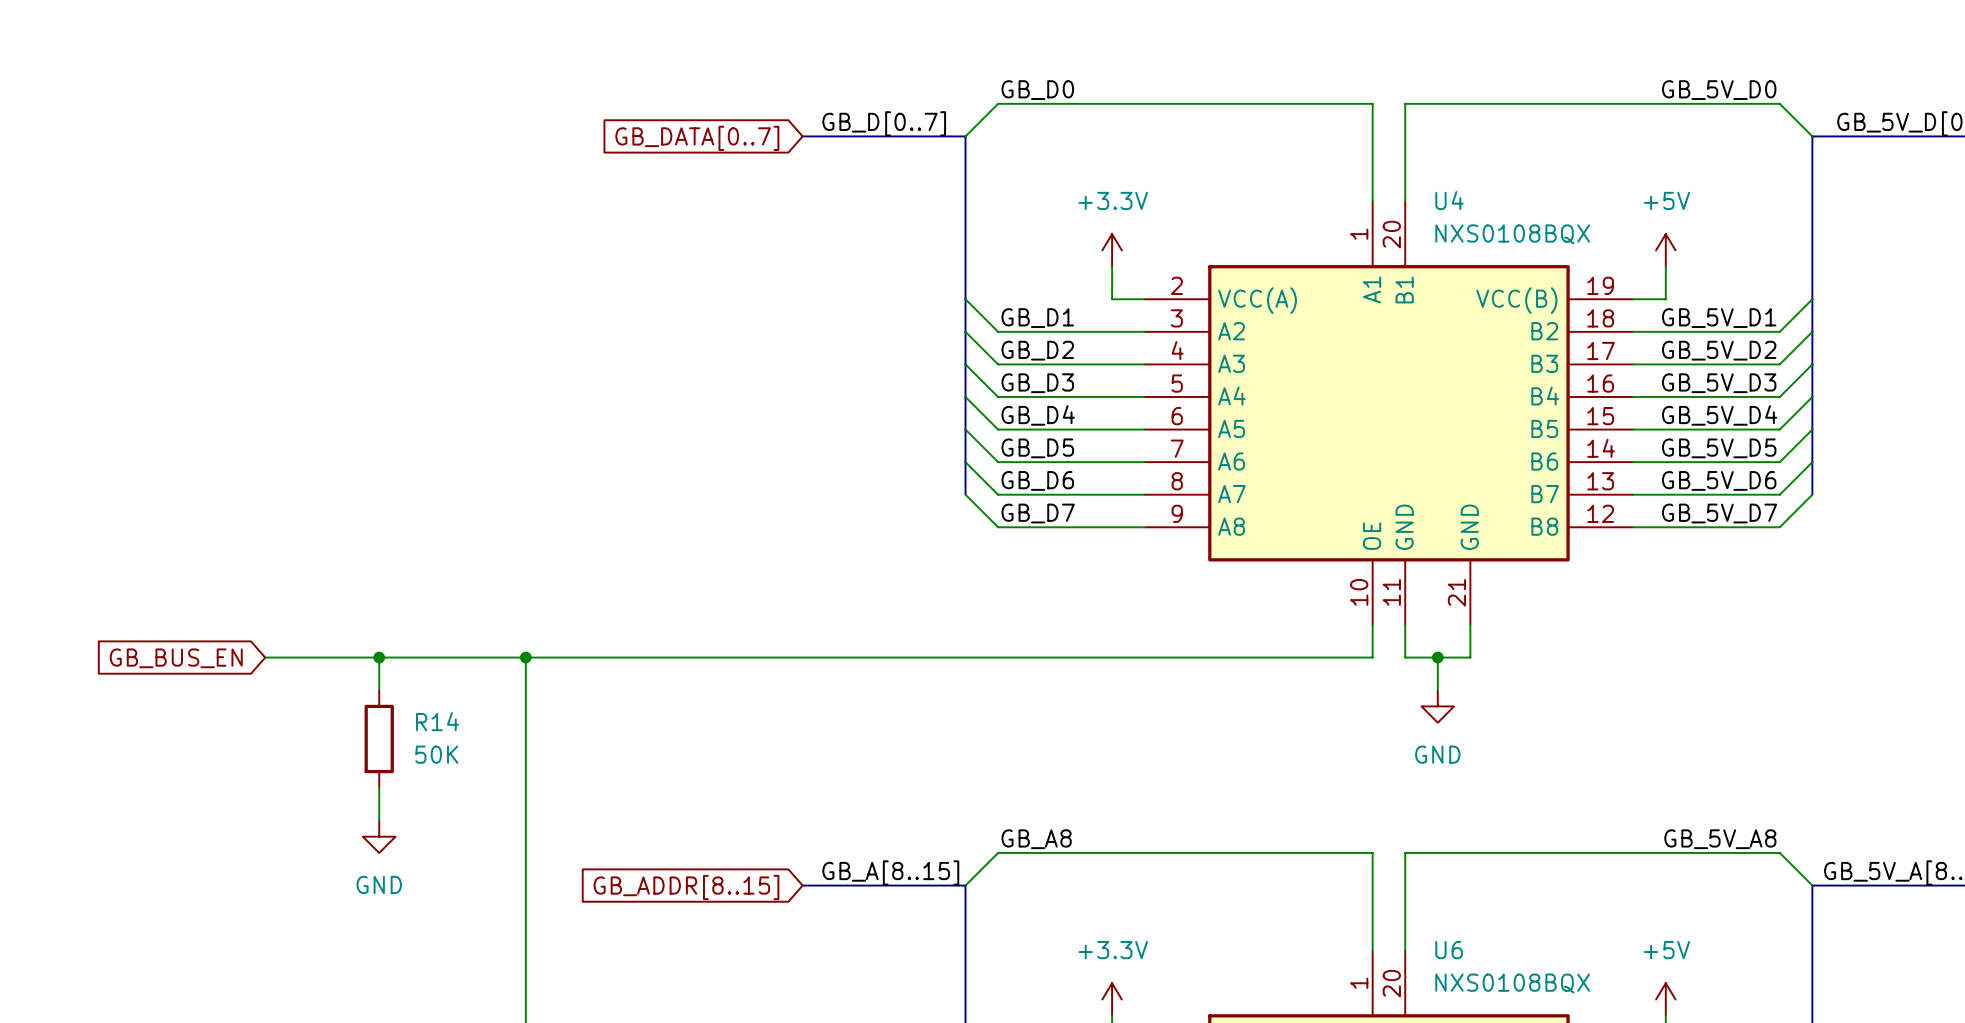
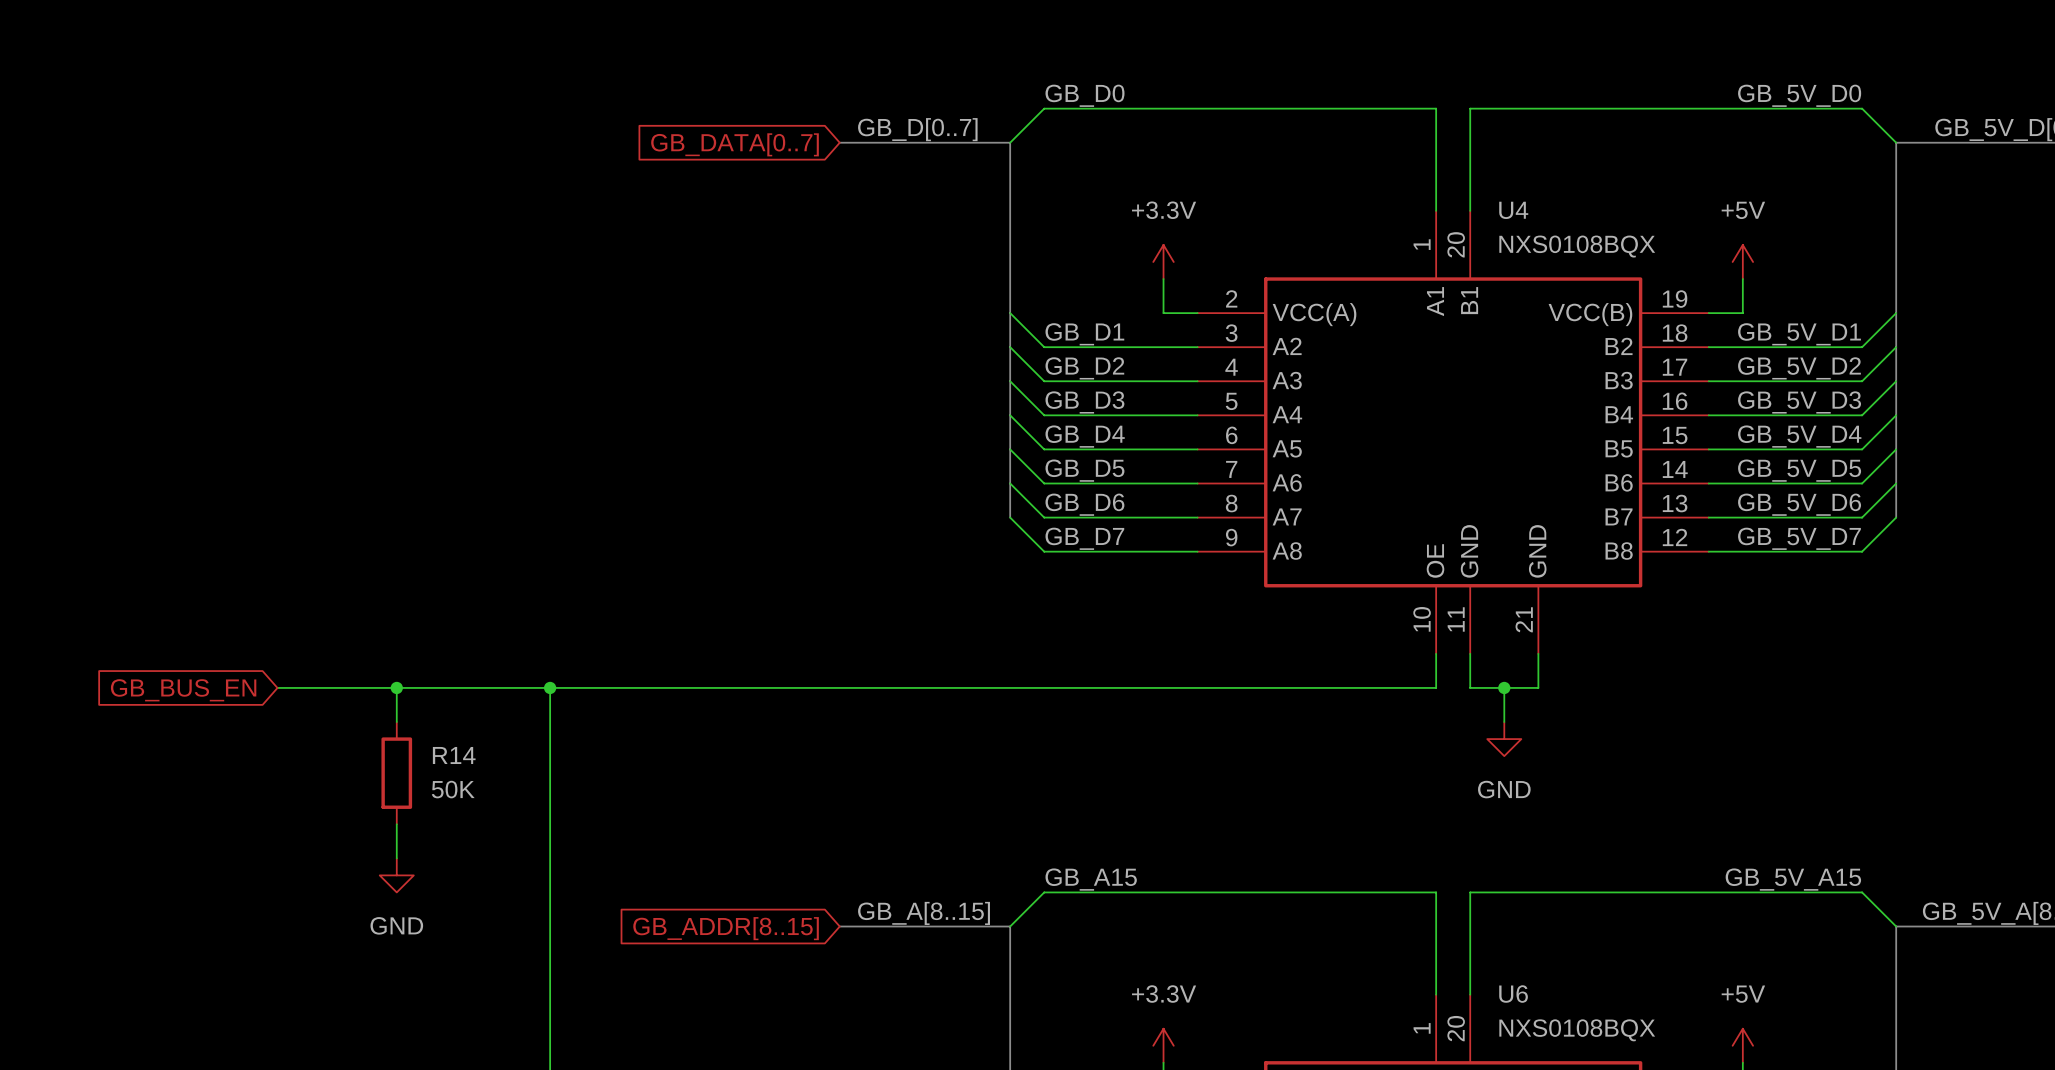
label: GB_A8 (1036, 839) -> GB_A15 (1091, 879)
label: GB_5V_A8 (1720, 839) -> GB_5V_A15 (1793, 879)

